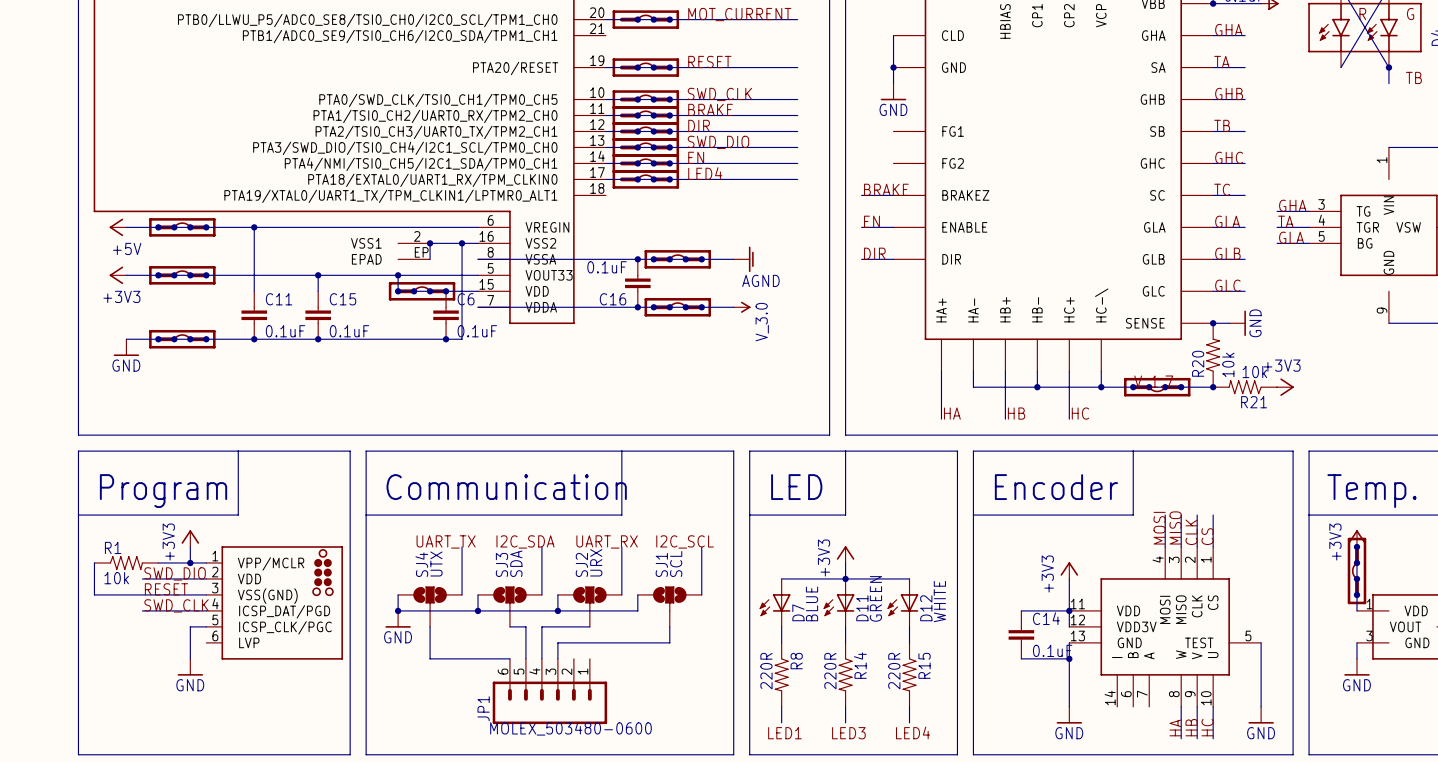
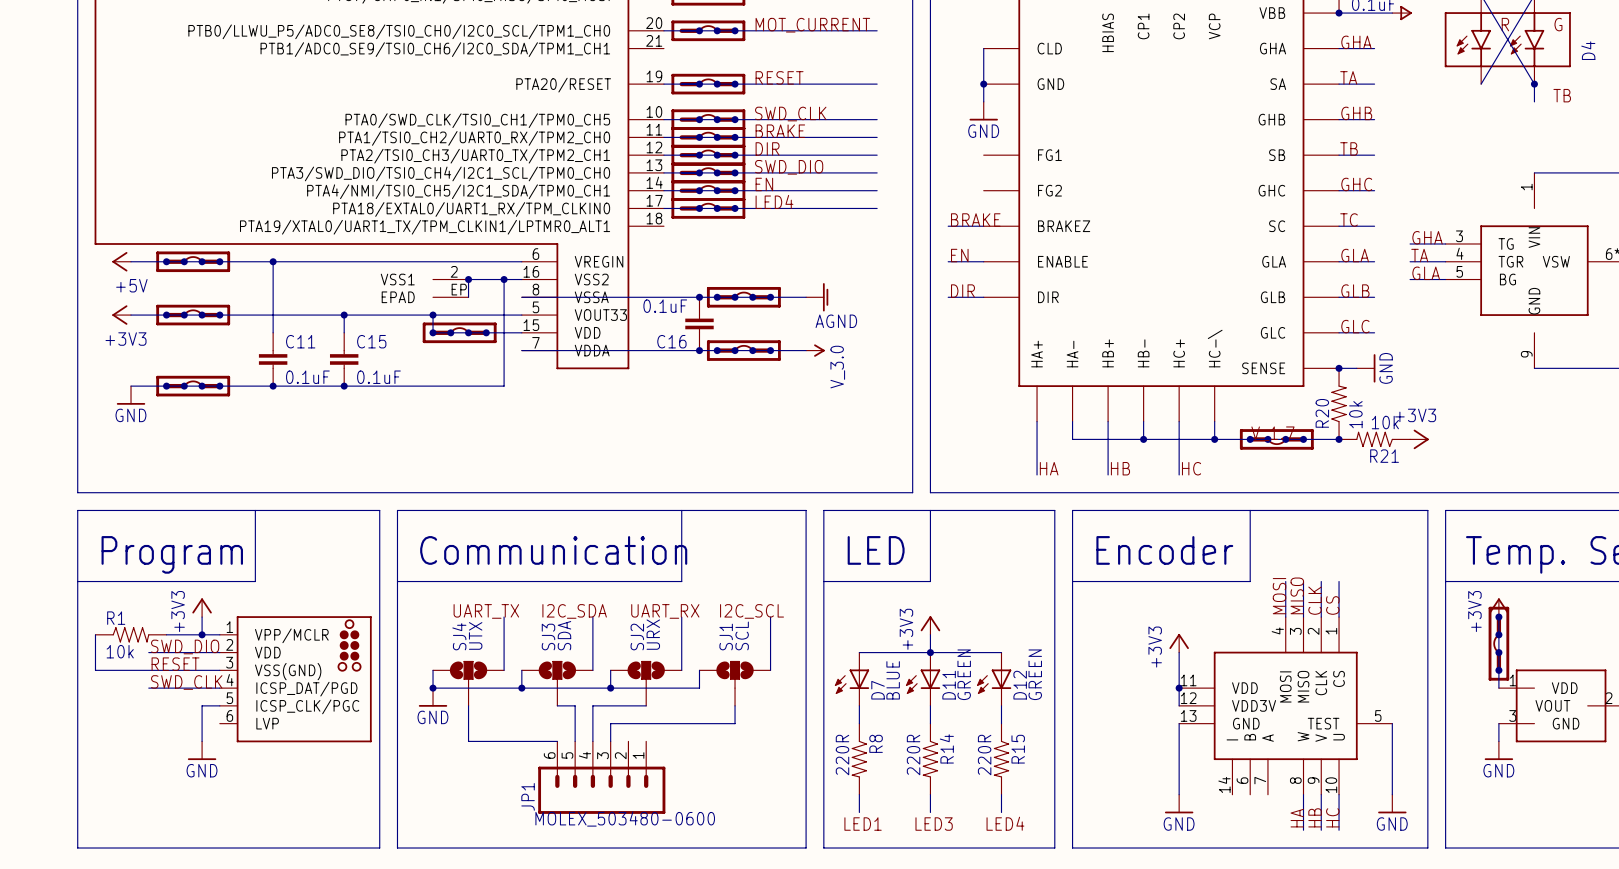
C6: 0.1uF (446, 315) -> none
junction: (446, 339) -> none
D12 value: WHITE (939, 601) -> GREEN (1035, 674)
wire: (1021, 610) (1069, 610) -> none
C14: 0.1uF (1021, 634) -> none
wire: (1021, 658) (1069, 658) -> none
junction: (1069, 658) -> none

